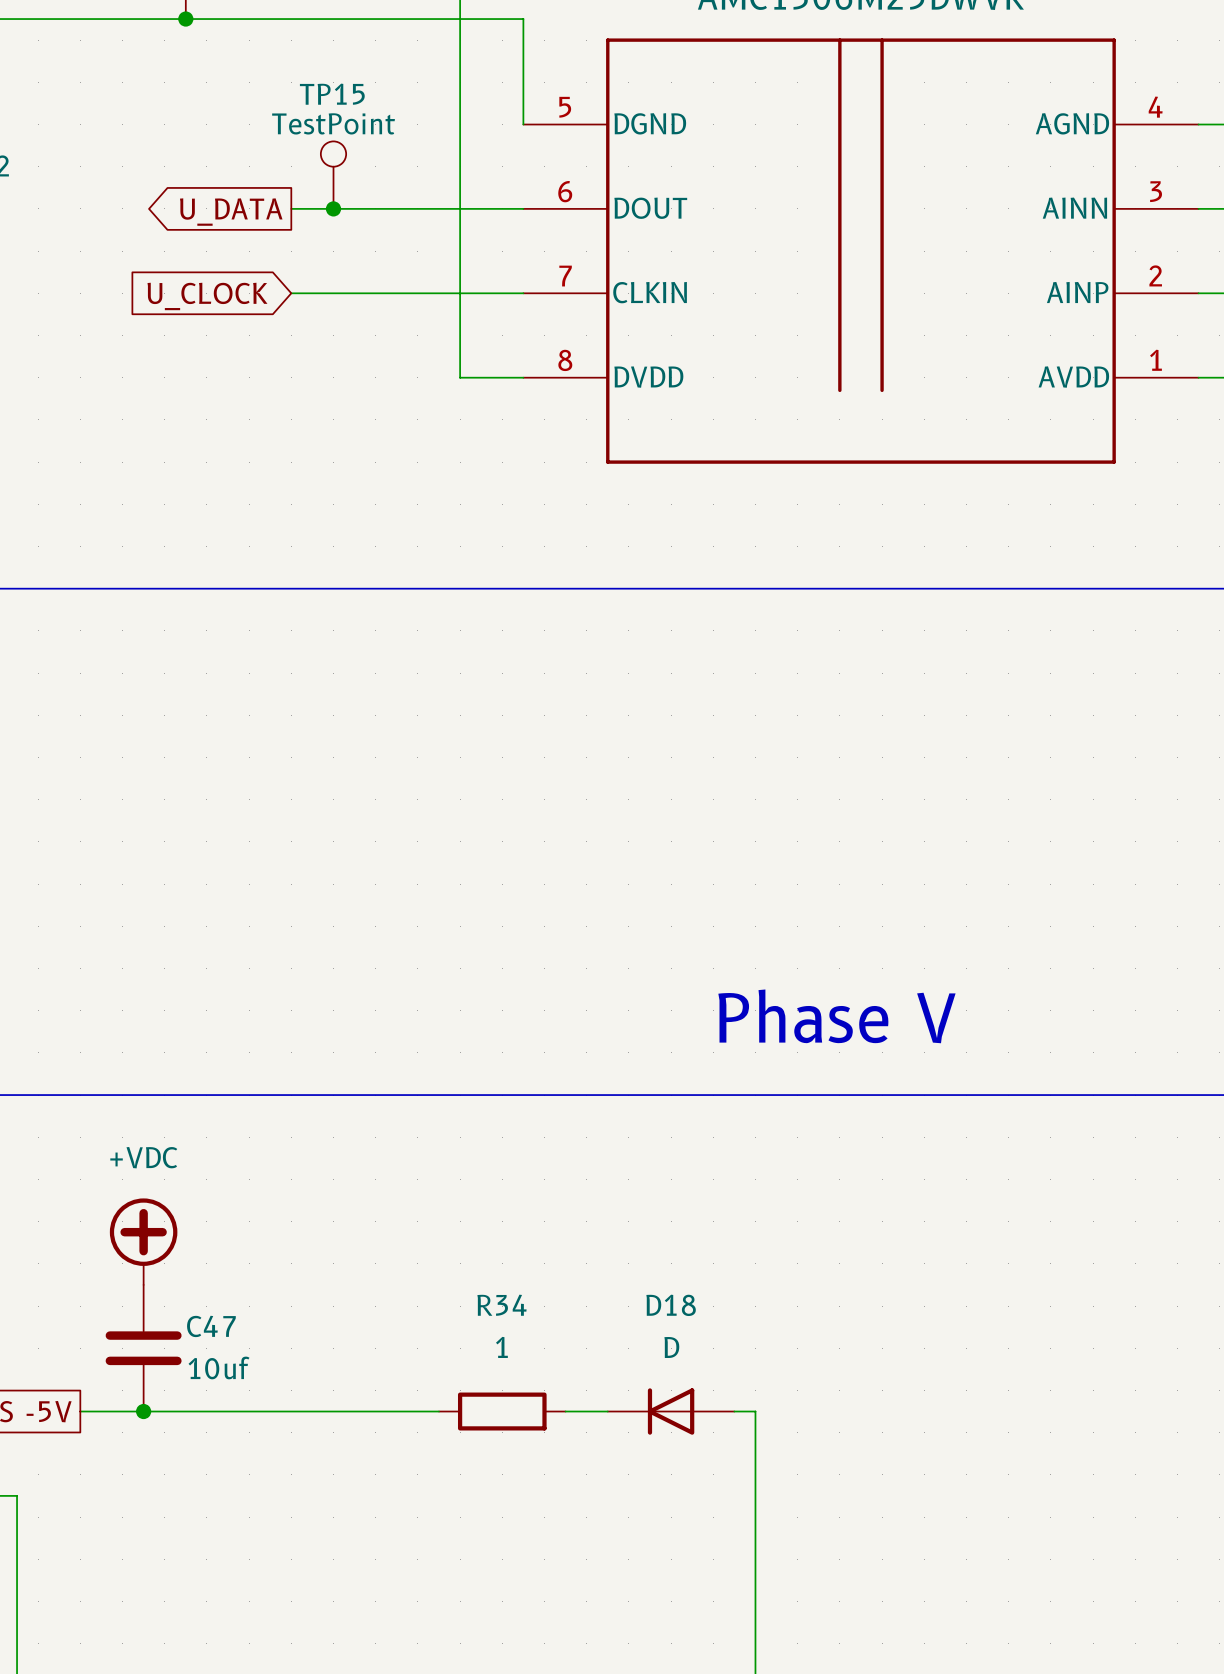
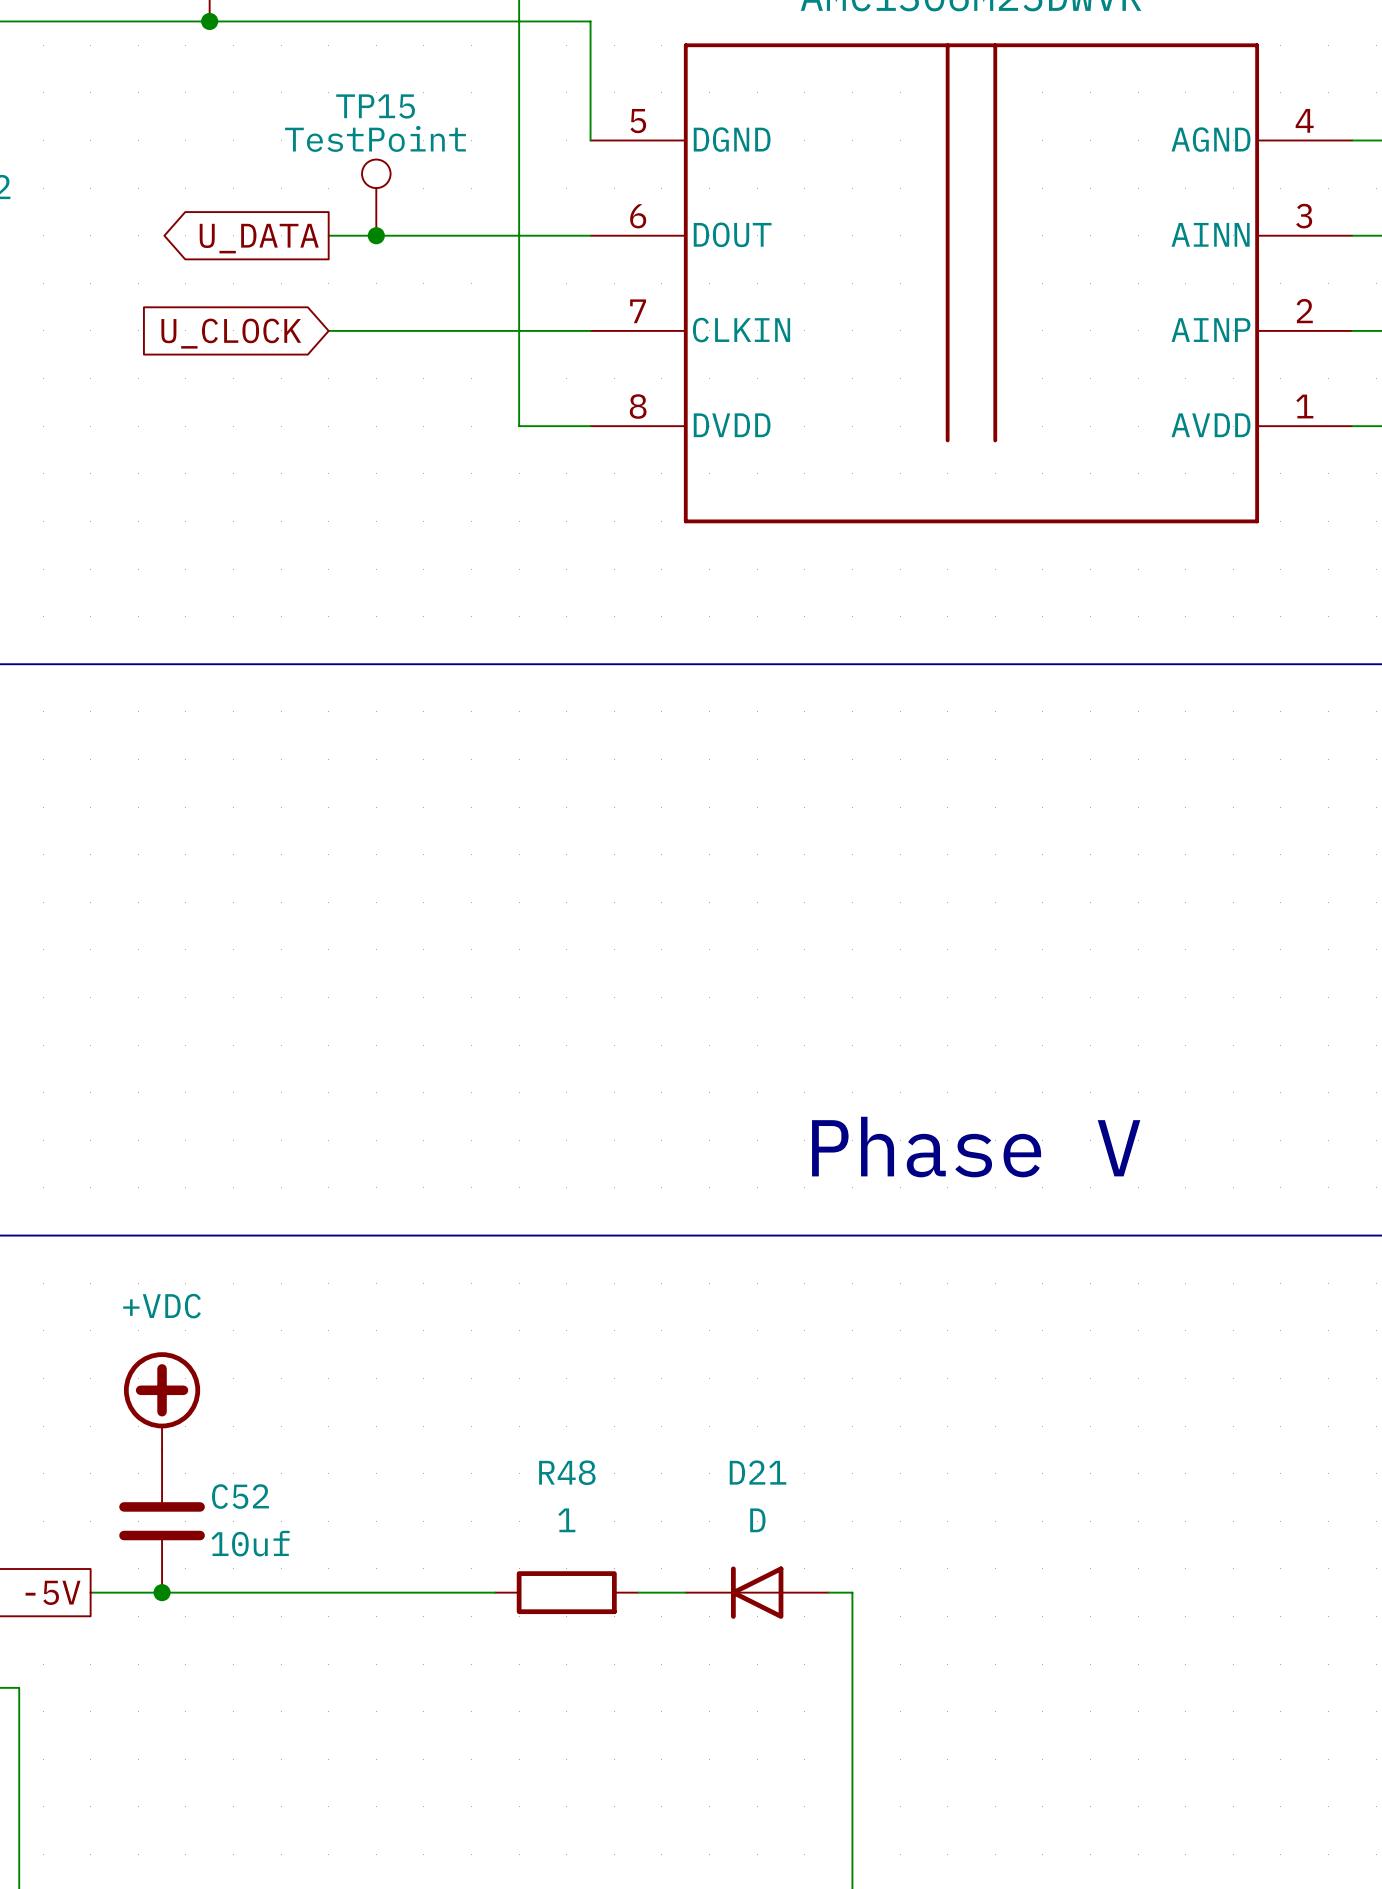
R34 name: R34 (501, 1305) -> R48 (567, 1472)
D18 name: D18 (671, 1305) -> D21 (758, 1472)
C47 name: C47 (211, 1326) -> C52 (240, 1496)

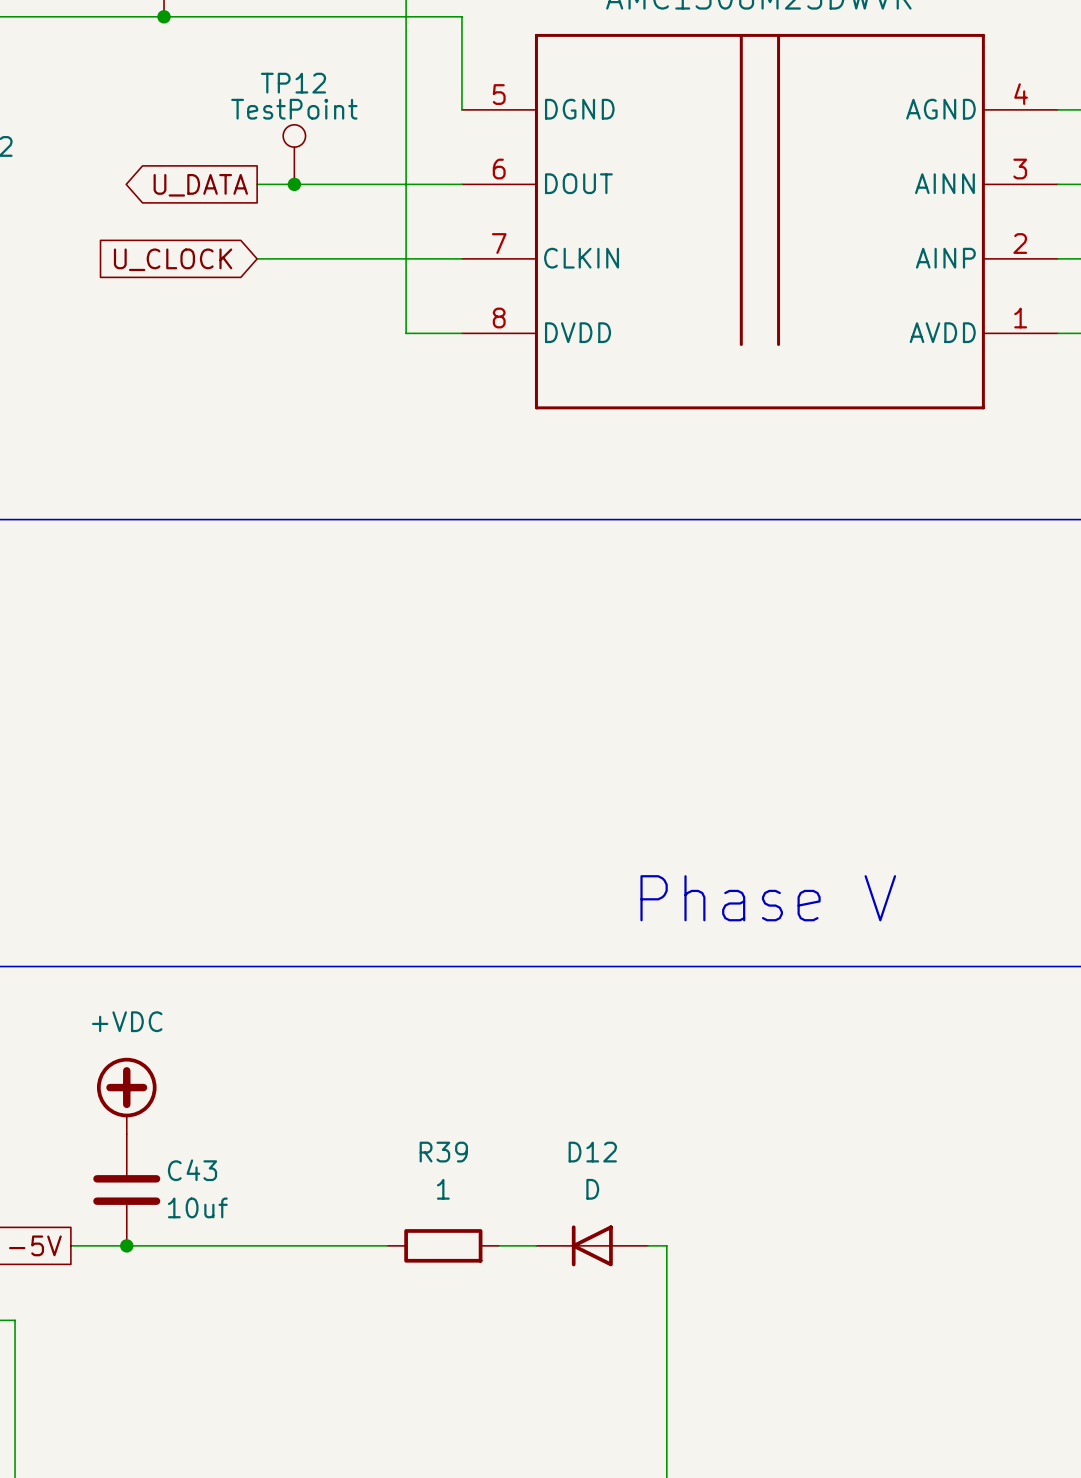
TP15 name: TP15 (375, 106) -> TP12 (293, 83)
R48 name: R48 (567, 1472) -> R39 (443, 1152)
D21 name: D21 (758, 1472) -> D12 (592, 1152)
C52 name: C52 (240, 1496) -> C43 (192, 1170)

